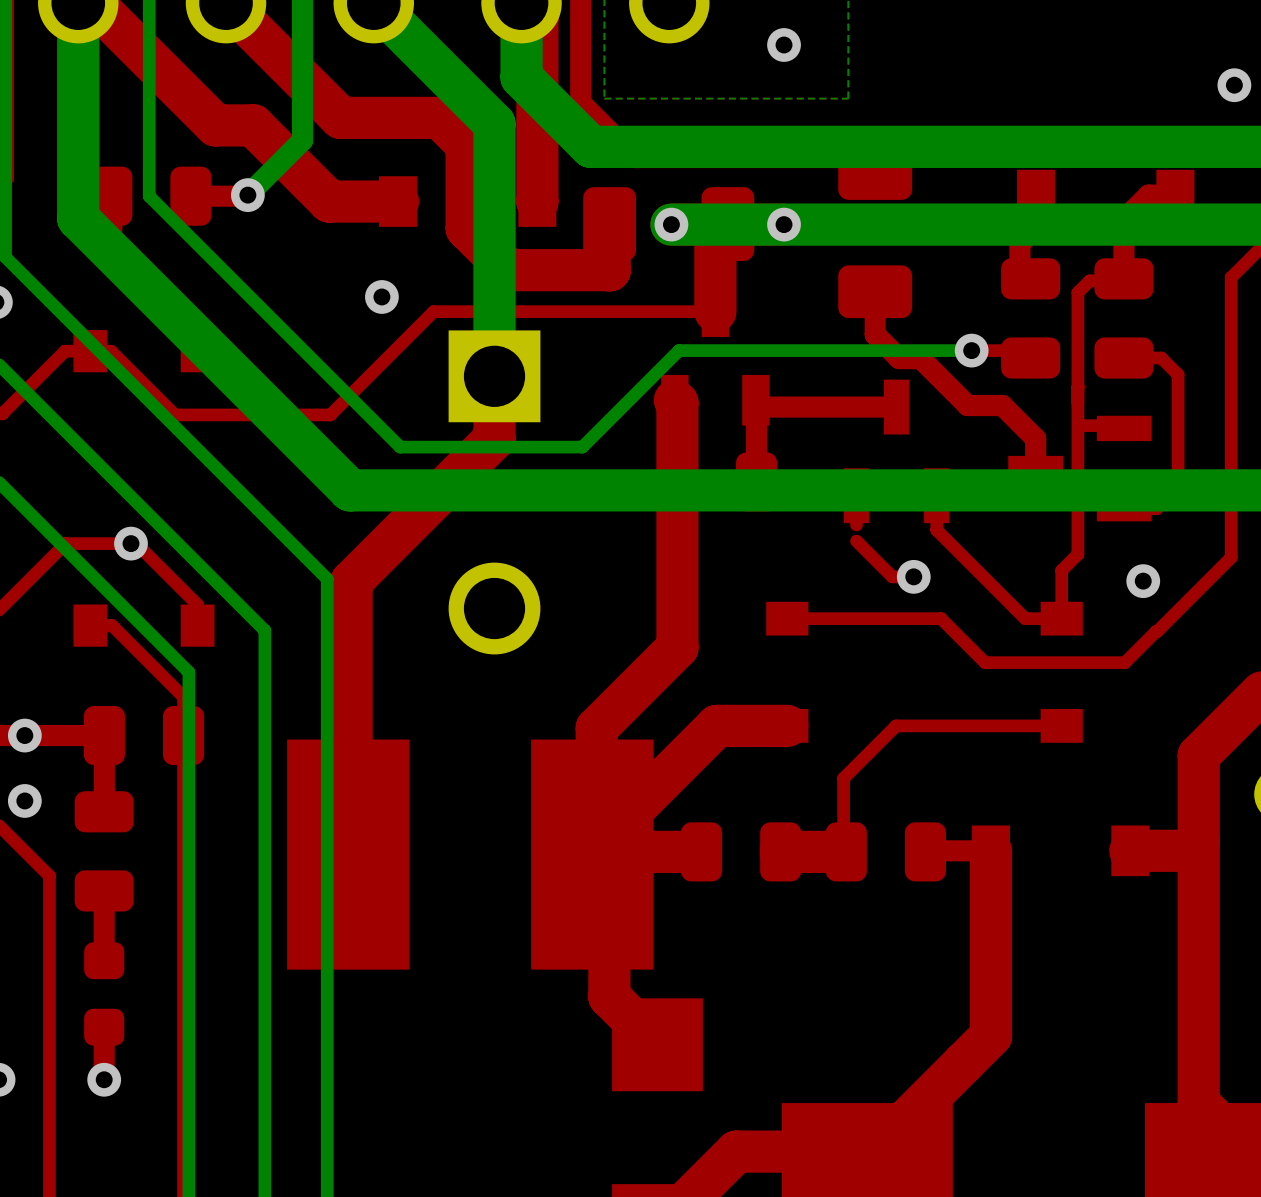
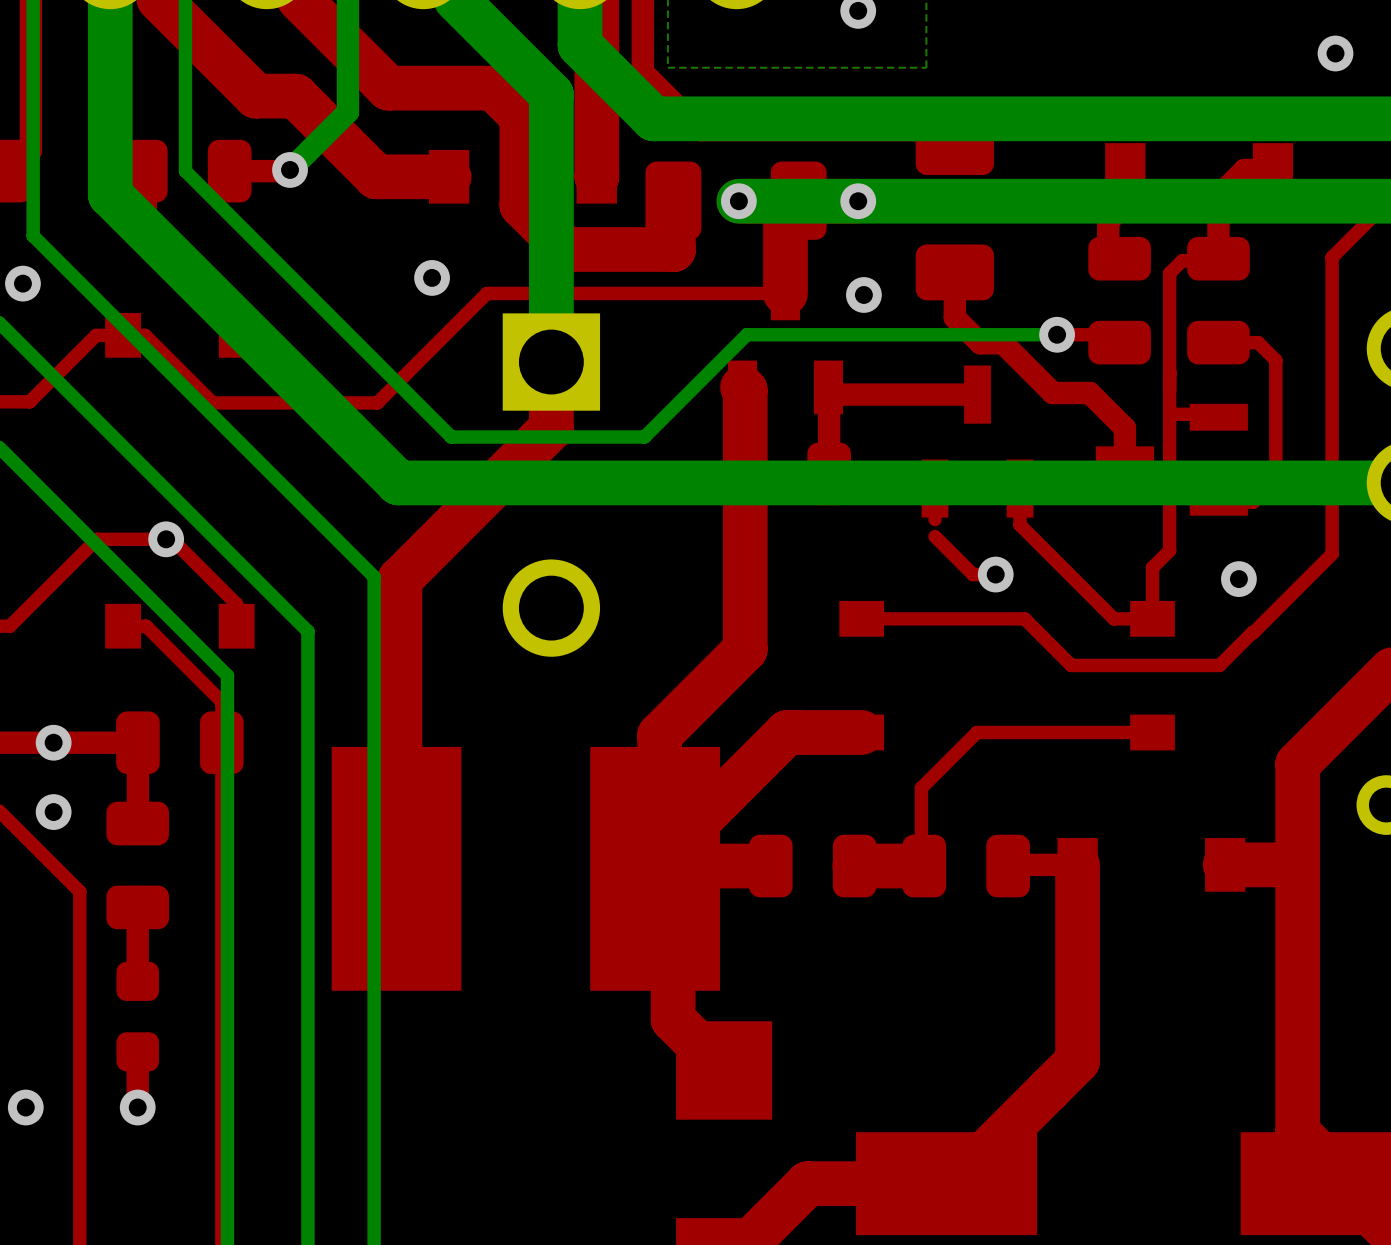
via: none -> (863, 294)

